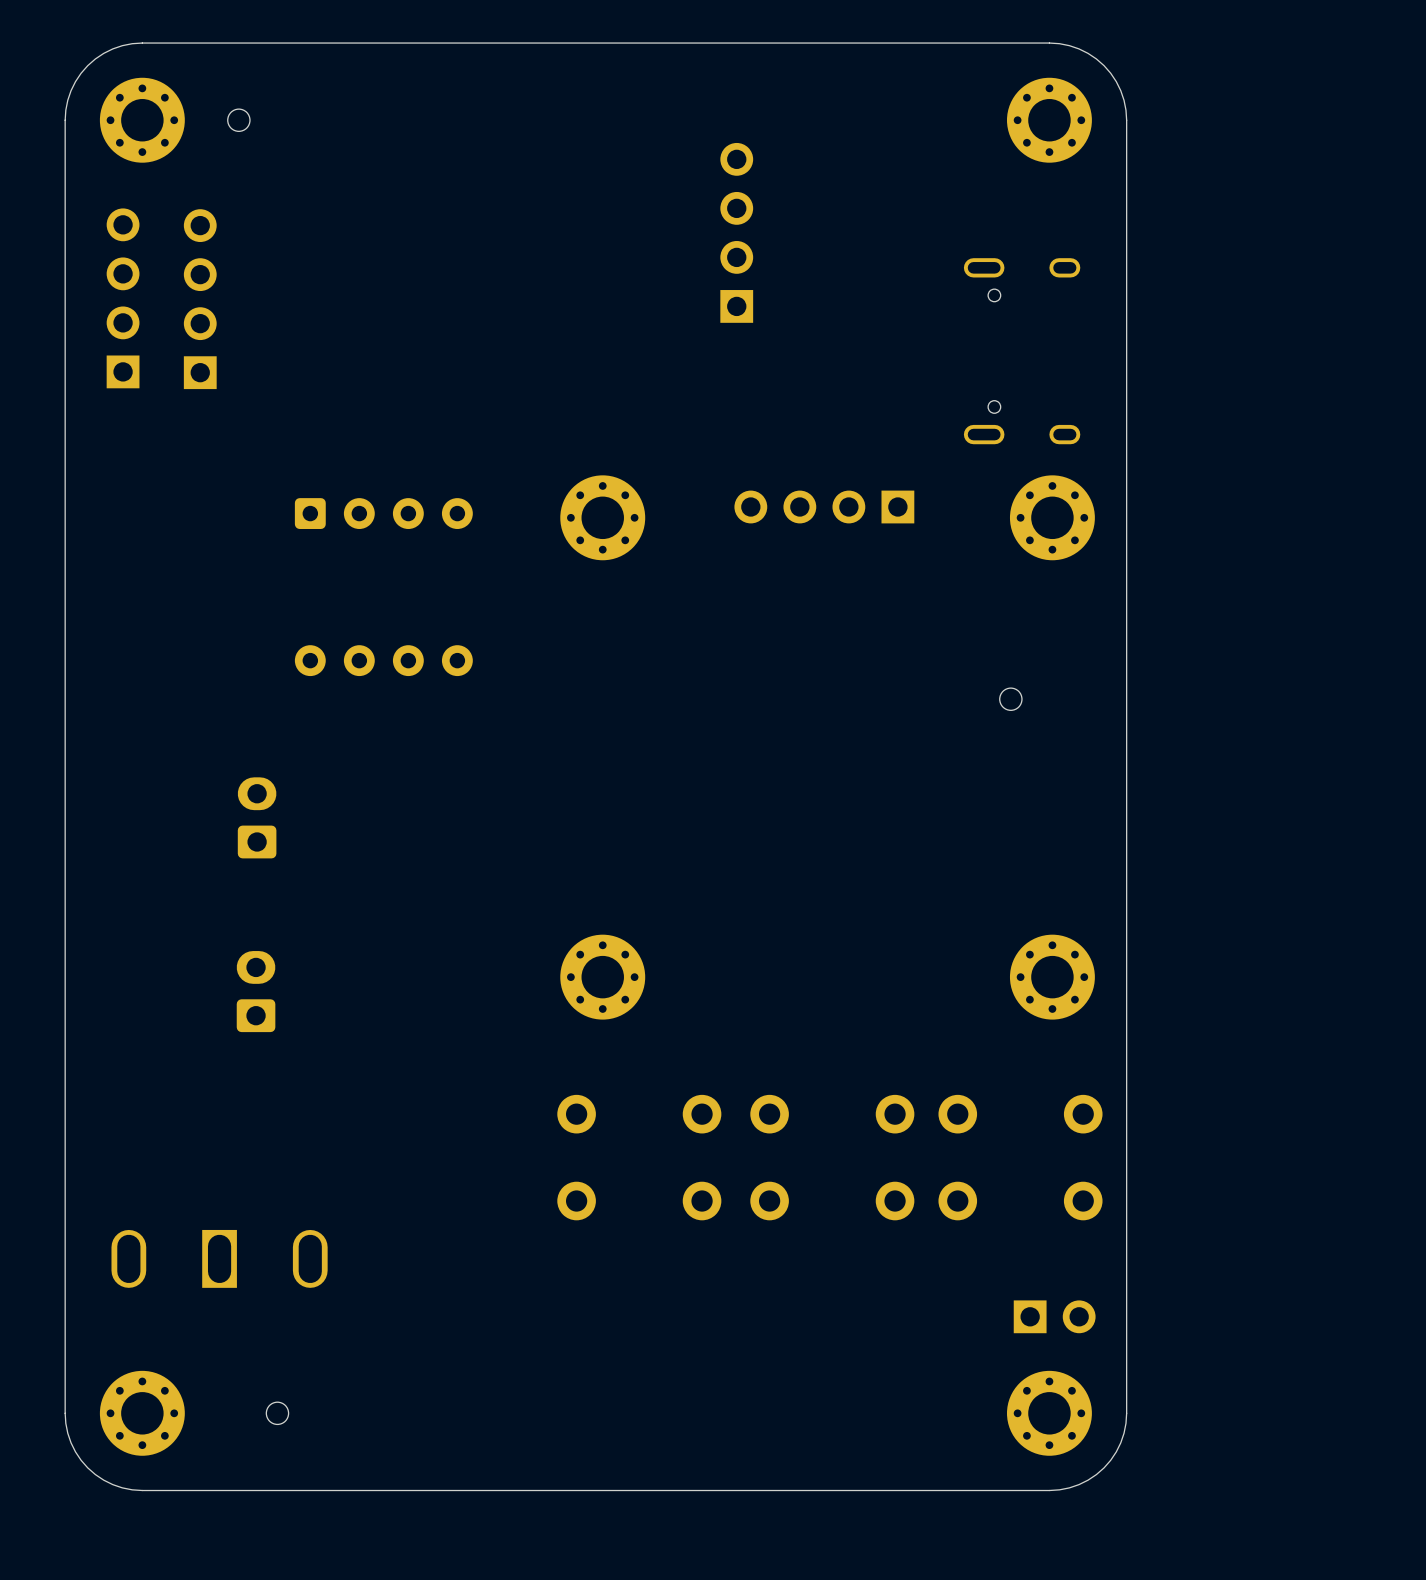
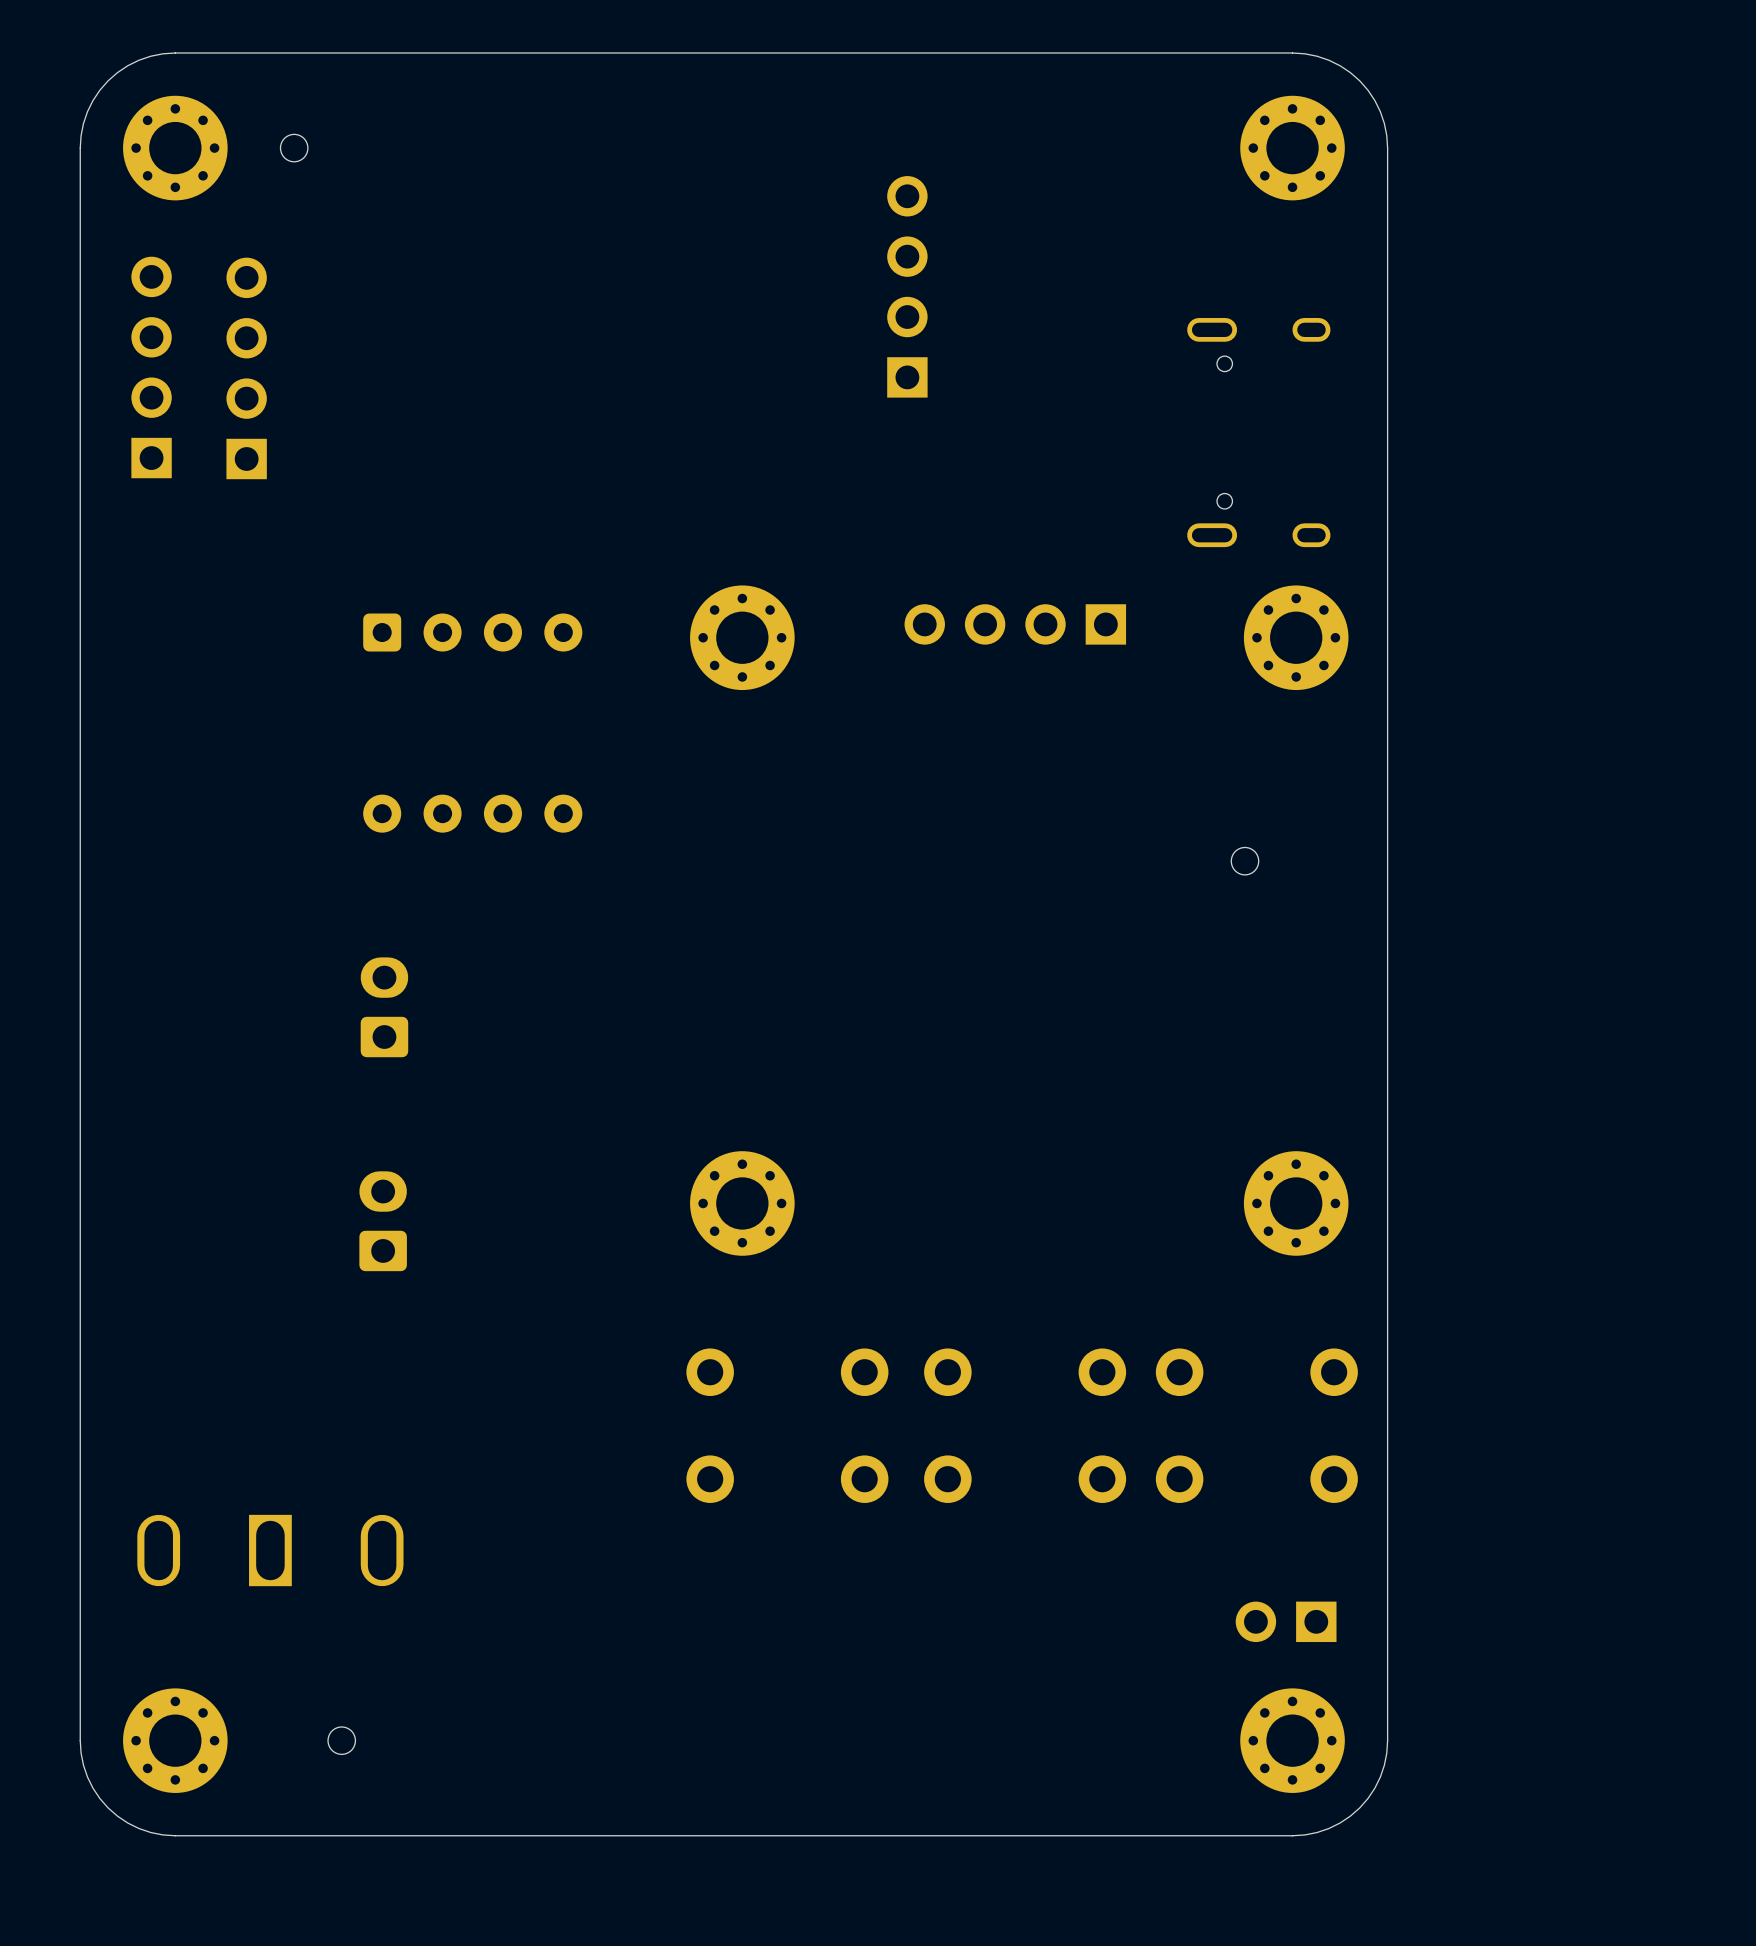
part position: (257, 817) -> (384, 1007)
part position: (256, 991) -> (383, 1221)
part rotation: 0° (1054, 1316) -> 180° (1286, 1621)

